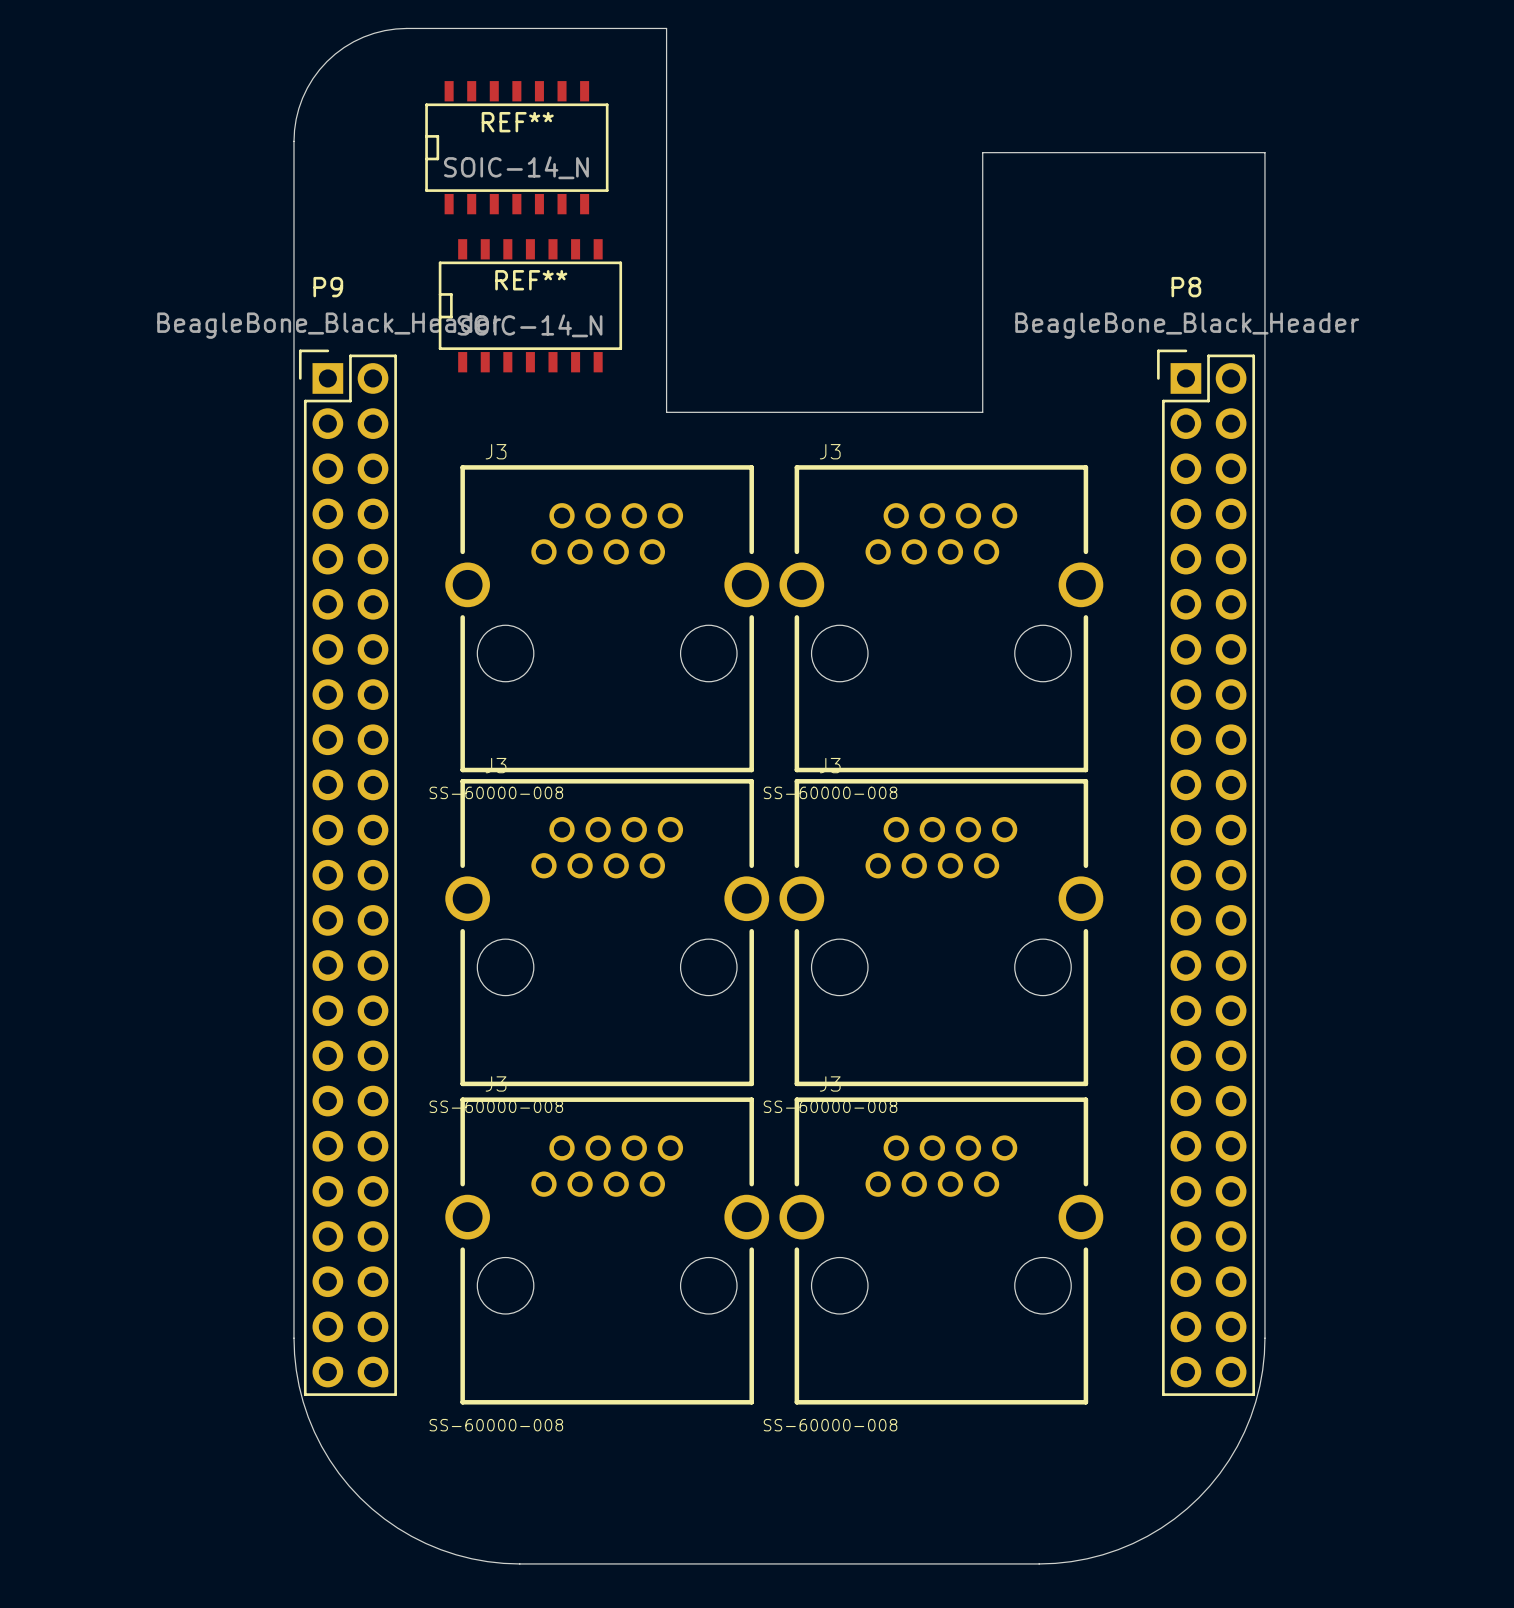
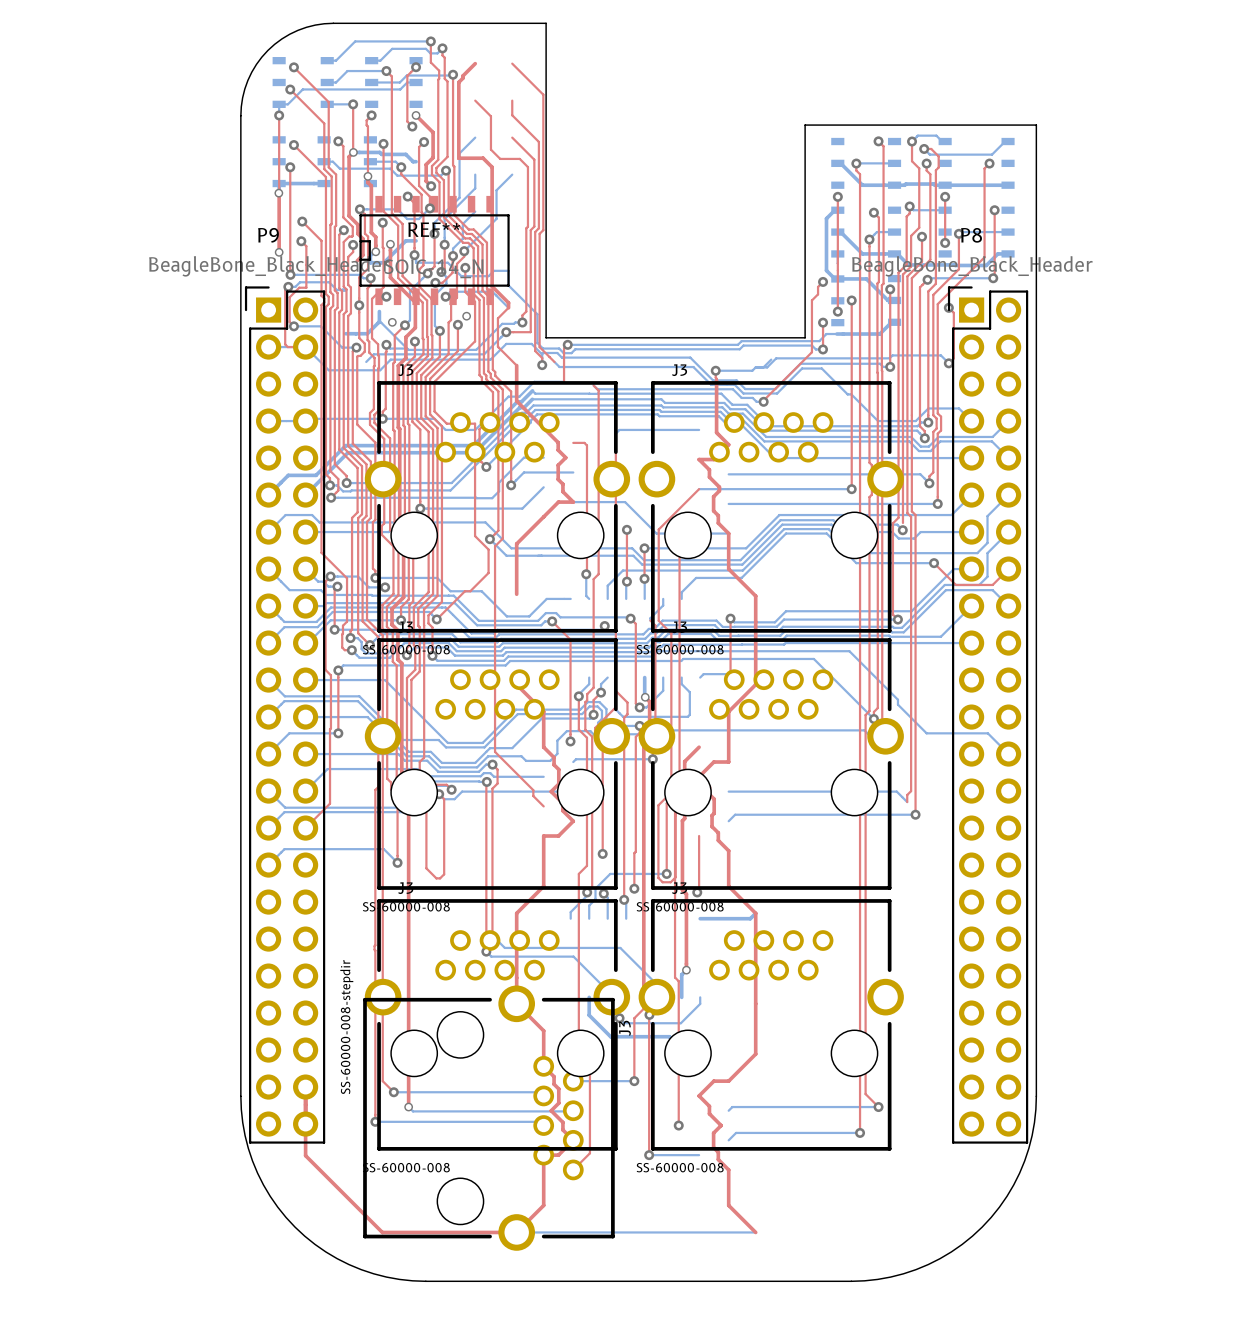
bottom track: none -> (430, 41) (355, 41) (336, 60) (327, 60)
top track: none -> (430, 41) (430, 62) (439, 70) (438, 159) (431, 166) (431, 174) (439, 182) (439, 219) (463, 242) (468, 242) (473, 248) (473, 294) (479, 299) (479, 375) (481, 381) (493, 392) (493, 415) (479, 429) (479, 460) (486, 466)
via: none -> (430, 41)
bottom track: none -> (442, 48) (437, 53) (430, 53) (425, 48) (392, 48) (380, 60) (371, 60)
top track: none -> (442, 48) (442, 55) (444, 57) (444, 78) (447, 81) (447, 156) (436, 168) (436, 172) (443, 180) (443, 217) (465, 238) (470, 238) (478, 246) (478, 292) (483, 298) (483, 373) (486, 379) (498, 391) (498, 530) (489, 539)
via: none -> (442, 48)
top track: none -> (475, 63) (458, 82) (458, 158)
top track: none -> (512, 63) (543, 94) (543, 230) (539, 233) (539, 347) (554, 362)
top track: none -> (293, 67) (328, 102) (328, 167) (336, 174) (334, 290) (337, 293) (337, 307) (334, 310) (334, 464) (346, 475) (346, 483)
via: none -> (293, 67)
top track: none -> (416, 67) (407, 75) (407, 121) (412, 126)
via: none -> (416, 67)
bottom track: none -> (386, 71) (347, 71) (336, 82) (327, 82)
top track: none -> (386, 71) (391, 76) (391, 213) (402, 223) (402, 276) (427, 300) (427, 355) (412, 371) (412, 421) (420, 429) (420, 508)
via: none -> (386, 71)
bottom track: none -> (453, 74) (406, 75) (399, 82) (371, 82)
top track: none -> (453, 74) (454, 215) (468, 229) (473, 229) (486, 242) (486, 288) (492, 294) (492, 369) (495, 375) (511, 391) (511, 485)
via: none -> (453, 74)
part: none -> (279, 82)
part: none -> (327, 82)
part: none -> (371, 82)
bottom track: none -> (416, 82) (407, 82) (400, 89) (302, 89) (287, 104) (279, 104) (279, 115)
part: none -> (416, 82)
top track: none -> (290, 89) (324, 123) (324, 169) (331, 176) (330, 292) (333, 294) (333, 305) (330, 308) (330, 471) (338, 479) (338, 490) (331, 497)
via: none -> (290, 89)
top track: none -> (475, 100) (490, 116) (490, 149) (500, 158) (519, 158) (527, 167) (526, 311) (522, 315) (522, 322)
top track: none -> (512, 100) (512, 115) (538, 141) (538, 228) (535, 232) (535, 351) (542, 358) (542, 365)
bottom track: none -> (327, 104) (353, 104)
top track: none -> (353, 104) (353, 152) (349, 156) (349, 215) (357, 224) (357, 233) (362, 238) (362, 255) (357, 260)
via: none -> (353, 104)
top track: none -> (279, 115) (279, 252)
via: none -> (279, 115)
top track: none -> (371, 115) (366, 120) (367, 182) (371, 185) (371, 232) (375, 237) (375, 251)
via: none -> (371, 115)
top track: none -> (416, 115) (433, 132) (433, 157) (426, 164) (426, 181) (431, 186)
via: none -> (416, 115)
REF**: SOIC-14_N (516, 147) -> none
via: none -> (412, 126)
bottom track: none -> (475, 137) (459, 153) (459, 197) (434, 222) (434, 233)
top track: none -> (512, 137) (534, 159) (534, 226) (530, 230) (530, 331) (506, 332)
top track: none -> (338, 141) (343, 146) (343, 217) (352, 226) (352, 235) (343, 242) (343, 286) (346, 289) (346, 311) (343, 314) (343, 447) (362, 466) (362, 514) (358, 518) (358, 633) (369, 645)
via: none -> (338, 141)
top track: none -> (878, 141) (883, 146) (882, 748)
via: none -> (878, 141)
bottom track: none -> (912, 141) (917, 135) (936, 135) (942, 141) (945, 141)
top track: none -> (912, 141) (912, 161) (919, 168) (919, 227) (911, 235) (911, 266) (902, 274) (902, 522)
via: none -> (912, 141)
bottom track: none -> (1008, 141) (1005, 141) (992, 154) (929, 154) (924, 148)
top track: none -> (424, 142) (419, 147) (419, 185) (429, 196) (429, 208)
via: none -> (424, 142)
top track: none -> (383, 143) (383, 211) (398, 225) (398, 277) (422, 302) (423, 354) (407, 369) (409, 515) (413, 519) (413, 601) (409, 605) (409, 645) (406, 648) (406, 655)
via: none -> (383, 143)
top track: none -> (293, 145) (325, 177) (325, 293) (328, 296) (328, 304) (325, 306) (325, 474) (330, 478) (330, 485)
via: none -> (293, 145)
top track: none -> (924, 148) (931, 148) (938, 156) (938, 167) (935, 170) (935, 283) (928, 291) (928, 422)
via: none -> (924, 148)
bottom track: none -> (353, 152) (405, 154) (413, 161) (416, 161)
via: none -> (353, 152)
top track: none -> (458, 158) (483, 158) (492, 167) (492, 286) (508, 302) (508, 307) (497, 318) (497, 346) (516, 365) (516, 401) (558, 442) (558, 450) (565, 457) (558, 465) (558, 479) (562, 484) (562, 491) (573, 502) (558, 502) (516, 543) (516, 594)
part: none -> (279, 161)
bottom track: none -> (324, 161) (332, 161) (339, 168) (390, 168) (397, 175) (441, 175) (446, 170)
part: none -> (324, 161)
bottom track: none -> (370, 161) (395, 161) (401, 167)
part: none -> (370, 161)
bottom track: none -> (837, 163) (840, 163) (862, 185) (1008, 185)
part: none -> (837, 163)
bottom track: none -> (856, 163) (894, 163)
top track: none -> (856, 163) (856, 170) (860, 174) (860, 1132)
via: none -> (856, 163)
part: none -> (894, 163)
top track: none -> (926, 163) (926, 170) (930, 174) (930, 259) (911, 278) (911, 511) (915, 515) (915, 814)
via: none -> (926, 163)
part: none -> (945, 163)
top track: none -> (989, 163) (984, 168) (984, 257) (937, 304) (937, 413) (941, 416) (941, 430) (937, 433) (937, 503)
via: none -> (989, 163)
part: none -> (1008, 163)
top track: none -> (290, 167) (290, 274)
via: none -> (290, 167)
top track: none -> (401, 167) (401, 174) (421, 194) (423, 265) (419, 269) (419, 286) (431, 298) (432, 335) (432, 357) (416, 373) (416, 419) (428, 431) (428, 592) (413, 607) (415, 669) (406, 678) (406, 774) (426, 794) (426, 868) (436, 878) (440, 878) (444, 874) (444, 799) (439, 794)
via: none -> (401, 167)
top track: none -> (446, 170) (448, 173) (448, 215) (466, 233) (471, 233) (482, 244) (482, 290) (488, 296) (488, 371) (490, 377) (502, 389) (502, 538) (495, 546) (495, 751) (533, 790) (533, 796) (543, 806)
via: none -> (446, 170)
bottom track: none -> (475, 174) (475, 188) (444, 218) (444, 244)
bottom track: none -> (512, 174) (496, 190) (496, 218) (464, 251)
via: none -> (367, 176)
bottom track: none -> (324, 183) (279, 183) (278, 193)
via: none -> (431, 186)
via: none -> (278, 193)
top track: none -> (407, 196) (414, 203) (414, 255)
via: none -> (407, 196)
top track: none -> (837, 196) (837, 311)
via: none -> (837, 196)
top track: none -> (945, 196) (945, 242)
via: none -> (945, 196)
bottom track: none -> (909, 206) (913, 210) (945, 210)
top track: none -> (909, 206) (909, 213) (906, 216) (906, 264) (898, 272) (898, 517) (892, 523) (892, 614) (897, 619)
via: none -> (909, 206)
bottom track: none -> (429, 208) (418, 219) (407, 219) (397, 209) (359, 209)
via: none -> (429, 208)
top track: none -> (359, 209) (364, 214) (364, 233) (368, 236) (368, 268) (359, 277) (359, 338) (364, 343) (364, 351) (357, 356) (357, 424) (375, 442) (375, 519) (372, 522) (372, 568) (375, 570) (375, 577)
via: none -> (359, 209)
bottom track: none -> (837, 210) (834, 210) (826, 218) (826, 270) (834, 278) (866, 278) (887, 300) (894, 300)
top track: none -> (994, 210) (993, 278)
via: none -> (994, 210)
bottom track: none -> (475, 211) (462, 224) (462, 238) (453, 248) (453, 256)
top track: none -> (873, 212) (878, 217) (877, 708) (873, 711) (873, 719)
via: none -> (873, 212)
top track: none -> (302, 221) (321, 240) (321, 295) (324, 298) (321, 305) (321, 552) (347, 578) (347, 621) (342, 625) (342, 647) (344, 650) (351, 650)
via: none -> (302, 221)
top track: none -> (382, 222) (383, 287) (372, 298) (372, 338) (378, 344) (379, 356) (378, 410) (374, 414) (374, 422) (390, 438) (390, 530)
via: none -> (382, 222)
top track: none -> (343, 230) (339, 234) (339, 288) (342, 291) (342, 309) (339, 312) (339, 449) (357, 468) (357, 512) (352, 517) (350, 638)
via: none -> (343, 230)
bottom track: none -> (837, 232) (840, 232) (862, 253) (897, 253) (908, 264) (986, 265) (997, 253) (1008, 253)
part: none -> (837, 232)
bottom track: none -> (894, 232) (876, 232) (869, 239)
part: none -> (894, 232)
part: none -> (945, 232)
bottom track: none -> (1008, 232) (960, 232) (958, 233)
part: none -> (1008, 232)
top track: none -> (434, 233) (434, 266) (427, 273)
via: none -> (434, 233)
top track: none -> (958, 233) (958, 269) (933, 294) (933, 415) (936, 418) (936, 428) (933, 431) (933, 472) (929, 476) (929, 483)
via: none -> (958, 233)
top track: none -> (922, 236) (922, 261) (907, 276) (907, 513) (911, 516) (911, 791) (907, 795) (907, 802)
via: none -> (922, 236)
top track: none -> (869, 239) (869, 462) (871, 465) (871, 494) (869, 497) (869, 711) (865, 715) (865, 1094) (878, 1107)
via: none -> (869, 239)
top track: none -> (301, 241) (306, 246) (306, 287) (299, 287) (289, 297) (289, 322) (293, 326)
via: none -> (301, 241)
bottom track: none -> (416, 240) (405, 240) (384, 262) (370, 262) (370, 255) (375, 251)
via: none -> (945, 242)
top track: none -> (353, 244) (353, 252) (348, 257) (348, 284) (350, 287) (350, 313) (348, 316) (348, 446) (366, 464) (366, 516) (362, 519) (362, 621) (378, 637) (378, 786) (375, 789) (375, 1121)
via: none -> (353, 244)
top track: none -> (390, 244) (390, 277) (415, 302) (415, 327) (405, 337) (405, 358) (398, 365) (399, 519) (403, 523) (403, 597) (392, 608) (392, 624) (397, 630) (397, 659) (401, 663) (401, 777) (408, 783) (408, 1107)
via: none -> (390, 244)
top track: none -> (444, 244) (444, 268) (441, 271)
via: none -> (444, 244)
top track: none -> (464, 251) (464, 256) (457, 263) (457, 297) (451, 303) (451, 320) (448, 322) (448, 354) (425, 377) (425, 416) (437, 428) (437, 595) (424, 609) (424, 625)
via: none -> (464, 251)
via: none -> (375, 251)
via: none -> (279, 252)
bottom track: none -> (414, 255) (416, 262) (447, 262) (461, 276) (488, 276) (493, 270) (508, 270) (508, 285) (537, 314) (537, 342) (542, 348) (559, 348) (563, 353) (571, 353) (575, 349) (739, 349) (743, 345) (812, 345) (815, 349) (823, 349)
via: none -> (414, 255)
top track: none -> (453, 256) (452, 272) (442, 282) (435, 282)
via: none -> (453, 256)
top track: none -> (465, 267) (465, 292) (475, 301) (475, 341) (434, 381) (434, 411) (446, 423) (475, 423) (475, 536) (488, 549) (488, 572) (470, 591) (464, 591) (436, 619)
via: none -> (465, 267)
bottom track: none -> (441, 271) (446, 276) (446, 283) (434, 295) (434, 325) (439, 330)
via: none -> (441, 271)
bottom track: none -> (427, 273) (409, 291) (409, 320) (404, 325)
via: none -> (427, 273)
bottom track: none -> (290, 274) (360, 274) (363, 278) (370, 278)
via: none -> (290, 274)
top track: none -> (370, 278) (370, 285) (367, 288) (367, 340) (369, 352) (374, 357) (374, 365) (373, 409) (369, 413) (369, 424) (384, 438) (384, 523) (381, 525) (381, 534) (393, 546) (393, 593) (382, 605) (382, 628) (387, 633) (387, 778) (391, 782) (391, 789)
via: none -> (370, 278)
bottom track: none -> (993, 278) (929, 278) (927, 279)
via: none -> (993, 278)
top track: none -> (927, 279) (919, 287) (919, 426) (924, 431) (924, 438)
via: none -> (927, 279)
top track: none -> (823, 281) (818, 286) (818, 294) (811, 300) (811, 352) (763, 401)
via: none -> (823, 281)
via: none -> (435, 282)
bottom track: none -> (288, 286) (295, 286) (300, 282) (329, 282) (336, 290) (345, 290) (342, 290)
top track: none -> (288, 286) (285, 290) (285, 344) (287, 347) (305, 347)
via: none -> (288, 286)
top track: none -> (890, 289) (890, 366)
via: none -> (890, 289)
via: none -> (386, 296)
bottom track: none -> (445, 296) (450, 291) (492, 291) (508, 307)
via: none -> (445, 296)
top track: none -> (851, 300) (851, 489)
via: none -> (851, 300)
part: none -> (894, 300)
part: none -> (837, 300)
via: none -> (359, 305)
top track: none -> (948, 307) (953, 312) (953, 358) (948, 363)
via: none -> (948, 307)
bottom track: none -> (379, 311) (379, 321) (367, 333) (345, 333)
via: none -> (837, 311)
via: none -> (466, 316)
via: none -> (392, 322)
bottom track: none -> (522, 322) (502, 323) (476, 349) (408, 349) (381, 322) (378, 322)
via: none -> (522, 322)
top track: none -> (823, 322) (823, 349)
via: none -> (823, 322)
bottom track: none -> (894, 322) (891, 322) (879, 334) (826, 334) (819, 341) (741, 341) (737, 344) (567, 344) (567, 341)
top track: none -> (457, 324) (457, 351) (430, 378) (430, 414) (441, 426) (441, 601) (428, 615) (428, 623) (432, 627) (432, 655)
via: none -> (457, 324)
top track: none -> (404, 325) (394, 335) (394, 361) (393, 363) (394, 521) (398, 525) (398, 595) (386, 606) (386, 626) (392, 632) (392, 661) (396, 665) (396, 782) (399, 785) (397, 795) (397, 862)
via: none -> (404, 325)
bottom track: none -> (293, 326) (320, 326) (342, 347) (356, 347)
via: none -> (293, 326)
top track: none -> (439, 330) (439, 356) (421, 375) (421, 418) (433, 429) (433, 594) (418, 608) (419, 671) (411, 679) (411, 773) (423, 784) (446, 784) (451, 789)
via: none -> (439, 330)
bottom track: none -> (506, 332) (484, 354) (373, 354) (366, 361)
via: none -> (506, 332)
top track: none -> (414, 341) (414, 356) (403, 367) (404, 517) (408, 521) (408, 599) (401, 607) (401, 620)
via: none -> (414, 341)
bottom track: none -> (386, 344) (390, 348) (407, 348)
top track: none -> (386, 344) (385, 408) (382, 411) (382, 418)
via: none -> (386, 344)
top track: none -> (567, 344) (564, 348) (564, 381)
via: none -> (567, 344)
bottom track: none -> (268, 347) (305, 347) (328, 370) (380, 370) (390, 359) (490, 359) (506, 343) (531, 343) (542, 354) (542, 365)
top track: none -> (356, 347) (352, 351) (352, 443) (370, 461) (370, 517) (367, 521) (367, 619) (382, 635) (382, 1081) (393, 1092)
via: none -> (356, 347)
via: none -> (823, 349)
bottom track: none -> (541, 354) (557, 352) (561, 357) (690, 357) (713, 380) (736, 380) (745, 389) (775, 389) (800, 363) (879, 363) (883, 366) (890, 366)
bottom track: none -> (771, 359) (763, 367)
bottom track: none -> (554, 362) (559, 367) (693, 367) (711, 384) (734, 384) (743, 393) (777, 393) (802, 368) (821, 368) (878, 421) (915, 421) (928, 408) (959, 408) (971, 421)
bottom track: none -> (948, 363) (940, 355) (892, 355) (889, 358) (776, 358) (767, 367) (755, 367) (752, 370) (715, 370)
via: none -> (948, 363)
via: none -> (542, 365)
via: none -> (890, 366)
top track: none -> (715, 370) (716, 432) (728, 444) (713, 459) (699, 459) (709, 469) (709, 477) (719, 487) (719, 490) (713, 496) (713, 510) (718, 515) (718, 523) (728, 533) (728, 569) (755, 596) (755, 684) (728, 711) (728, 762) (713, 762) (699, 776) (709, 787) (709, 794) (714, 799) (712, 826) (718, 832) (718, 840) (728, 850) (728, 886)
via: none -> (715, 370)
bottom track: none -> (564, 381) (534, 381) (519, 396) (508, 396) (475, 429) (445, 429) (434, 418) (307, 418) (305, 421) (268, 421)
bottom track: none -> (593, 385) (597, 389) (732, 389) (741, 397) (752, 397) (756, 401) (763, 401)
top track: none -> (593, 385) (598, 390) (598, 574) (593, 579) (593, 687) (587, 694) (585, 702) (585, 729) (592, 736) (592, 887) (587, 892)
bottom track: none -> (589, 393) (535, 393) (532, 390) (521, 401) (517, 401) (473, 445) (345, 445) (316, 475) (288, 475) (268, 495)
bottom track: none -> (589, 393) (597, 393)
bottom track: none -> (597, 393) (721, 393) (732, 404) (747, 404) (768, 426) (917, 426) (921, 422) (928, 422)
via: none -> (763, 401)
via: none -> (382, 418)
bottom track: none -> (1008, 421) (992, 436) (938, 436) (928, 446) (920, 446) (911, 436) (766, 436) (742, 413) (728, 413) (722, 407) (533, 405) (526, 412) (521, 412) (451, 483) (346, 483)
via: none -> (928, 422)
bottom track: none -> (699, 429) (619, 429) (615, 433)
top track: none -> (615, 433) (615, 690) (627, 702) (627, 714) (624, 717) (624, 899)
bottom track: none -> (924, 438) (917, 430) (766, 430) (745, 409) (730, 409) (724, 402) (665, 402) (661, 399) (532, 399) (524, 407) (519, 407) (474, 452) (347, 452) (305, 495)
via: none -> (924, 438)
top track: none -> (573, 442) (584, 442) (586, 445) (586, 574)
bottom track: none -> (543, 457) (523, 457) (499, 482) (499, 491) (492, 498) (331, 497)
bottom track: none -> (971, 458) (774, 458) (739, 422) (725, 422) (718, 416) (537, 414) (486, 466)
bottom track: none -> (1008, 458) (991, 441) (940, 441) (930, 451) (919, 451) (909, 441) (764, 441) (741, 418) (726, 418) (720, 411) (535, 409) (528, 417) (523, 417) (450, 490) (343, 491) (337, 485) (330, 485)
via: none -> (486, 466)
bottom track: none -> (573, 472) (523, 472) (511, 485)
bottom track: none -> (728, 474) (920, 474) (929, 483)
via: none -> (346, 483)
via: none -> (929, 483)
via: none -> (330, 485)
via: none -> (511, 485)
bottom track: none -> (543, 487) (522, 508) (420, 508)
bottom track: none -> (699, 489) (851, 489)
top track: none -> (699, 489) (658, 529) (658, 620) (671, 633) (671, 792) (658, 805) (658, 877) (662, 882) (670, 882) (675, 877) (675, 808)
via: none -> (851, 489)
bottom track: none -> (971, 495) (951, 515) (779, 515) (746, 548) (644, 548)
bottom track: none -> (1008, 495) (987, 516) (987, 542) (977, 553) (852, 553) (828, 529) (784, 529) (742, 570) (622, 570) (607, 585) (607, 598)
via: none -> (331, 497)
bottom track: none -> (573, 502) (625, 502) (656, 533) (728, 533)
bottom track: none -> (728, 503) (937, 503)
via: none -> (937, 503)
via: none -> (420, 508)
top track: none -> (682, 518) (682, 525) (679, 528) (679, 790) (666, 803) (666, 873)
top track: none -> (626, 529) (626, 581)
via: none -> (626, 529)
bottom track: none -> (390, 530) (305, 532)
bottom track: none -> (902, 530) (897, 524) (837, 524) (833, 520) (780, 520) (740, 560) (644, 560) (632, 548) (511, 548) (485, 522) (319, 522) (312, 515) (285, 515) (268, 532)
via: none -> (902, 530)
bottom track: none -> (971, 532) (920, 532) (914, 538) (898, 538) (892, 532) (838, 532) (831, 524) (782, 524) (742, 564) (642, 564) (633, 555) (506, 555) (489, 539)
bottom track: none -> (1008, 532) (987, 553) (987, 576) (979, 584) (944, 584) (901, 627) (783, 626) (778, 631) (736, 631)
via: none -> (489, 539)
top track: none -> (644, 548) (644, 578)
via: none -> (644, 548)
bottom track: none -> (934, 563) (856, 563) (826, 533) (786, 533) (741, 577) (696, 577) (681, 592) (681, 598)
top track: none -> (934, 563) (955, 584) (992, 584) (1008, 569)
via: none -> (934, 563)
bottom track: none -> (268, 569) (289, 590) (320, 590) (325, 594) (453, 595) (478, 620) (538, 620) (545, 613) (556, 613) (560, 617) (629, 617)
bottom track: none -> (305, 569) (318, 581) (323, 581) (328, 586) (337, 586)
bottom track: none -> (971, 569) (953, 569) (911, 611) (786, 611) (774, 622) (734, 622) (730, 618)
bottom track: none -> (586, 574) (586, 595) (589, 598)
via: none -> (586, 574)
bottom track: none -> (330, 576) (358, 576) (368, 587) (385, 587)
top track: none -> (330, 576) (325, 581) (325, 670) (330, 675) (330, 803) (305, 828)
via: none -> (330, 576)
bottom track: none -> (375, 577) (437, 577) (450, 591) (481, 591) (506, 616) (529, 616) (546, 598) (570, 598)
via: none -> (375, 577)
bottom track: none -> (644, 579) (644, 598)
via: none -> (644, 578)
bottom track: none -> (626, 581) (626, 598)
via: none -> (626, 581)
top track: none -> (337, 586) (334, 589) (334, 629)
via: none -> (337, 586)
via: none -> (385, 587)
bottom track: none -> (663, 598) (663, 605) (650, 620)
bottom track: none -> (268, 606) (284, 621) (316, 621) (330, 607) (445, 607) (471, 633) (493, 633) (497, 629) (604, 629) (604, 626)
bottom track: none -> (305, 606) (323, 606) (326, 603) (454, 603) (477, 625) (541, 625) (545, 621) (552, 621)
bottom track: none -> (971, 606) (940, 636) (786, 635) (782, 640) (740, 640)
bottom track: none -> (1008, 606) (992, 590) (945, 590) (903, 632) (784, 631) (780, 635) (738, 635)
top track: none -> (630, 618) (635, 623) (635, 703) (639, 707)
via: none -> (630, 618)
top track: none -> (730, 618) (730, 674)
via: none -> (730, 618)
bottom track: none -> (436, 619) (429, 611) (332, 611) (317, 627) (284, 627) (268, 643)
via: none -> (436, 619)
bottom track: none -> (897, 619) (784, 619) (776, 626) (734, 626)
via: none -> (897, 619)
bottom track: none -> (401, 620) (330, 620) (307, 643) (305, 643)
via: none -> (401, 620)
top track: none -> (650, 620) (655, 625) (655, 734) (651, 738) (652, 759)
top track: none -> (552, 621) (570, 639) (570, 741)
via: none -> (552, 621)
top track: none -> (424, 625) (424, 757) (419, 761) (419, 769)
via: none -> (604, 626)
bottom track: none -> (734, 626) (722, 626) (716, 620) (662, 620) (654, 628) (648, 628) (643, 634) (499, 634) (495, 637) (469, 637) (461, 629) (334, 629)
via: none -> (334, 629)
bottom track: none -> (736, 631) (721, 631) (714, 625) (664, 625) (656, 633) (650, 633) (645, 638) (500, 638) (497, 642) (460, 642) (452, 634) (380, 634) (369, 645)
bottom track: none -> (738, 635) (719, 635) (712, 629) (666, 629) (658, 637) (652, 637) (647, 643) (502, 643) (499, 646) (458, 646) (450, 638) (402, 638) (387, 653) (365, 653) (361, 649) (361, 642) (357, 638) (350, 638)
via: none -> (350, 638)
bottom track: none -> (740, 640) (717, 640) (711, 633) (668, 633) (659, 642) (654, 642) (648, 647) (504, 647) (501, 651) (456, 651) (448, 643) (404, 643) (389, 657) (359, 657) (351, 650)
bottom track: none -> (971, 643) (742, 644)
bottom track: none -> (741, 644) (663, 644) (656, 646) (650, 652) (506, 652) (502, 655) (454, 655) (446, 647) (414, 647) (406, 655)
via: none -> (369, 645)
via: none -> (351, 650)
via: none -> (406, 655)
bottom track: none -> (432, 655) (437, 660) (504, 660) (508, 656) (652, 656) (657, 651) (849, 651) (897, 699) (897, 704) (926, 733) (987, 733) (1008, 754)
via: none -> (432, 655)
bottom track: none -> (338, 670) (343, 665) (505, 665) (510, 661) (813, 658) (873, 719)
top track: none -> (338, 670) (338, 733)
via: none -> (338, 670)
bottom track: none -> (730, 674) (703, 674) (700, 677)
bottom track: none -> (589, 677) (589, 684) (578, 696)
bottom track: none -> (607, 677) (601, 684) (601, 692)
bottom track: none -> (644, 677) (645, 697)
bottom track: none -> (663, 677) (663, 690) (646, 707) (639, 707)
bottom track: none -> (681, 677) (681, 684) (689, 692) (689, 714) (687, 716) (623, 716) (614, 708)
bottom track: none -> (268, 680) (284, 696) (359, 696) (403, 740) (438, 740) (446, 747) (484, 747) (517, 714) (582, 714) (589, 706) (597, 706) (601, 710) (601, 718) (598, 722) (598, 732) (603, 737) (612, 737) (624, 725) (639, 725)
bottom track: none -> (305, 680) (384, 680) (447, 742) (482, 742) (515, 709) (580, 709) (587, 702) (599, 702) (606, 709) (607, 729)
top track: none -> (516, 684) (543, 711) (543, 747) (554, 757) (554, 764) (558, 769) (558, 784) (551, 791) (562, 803) (562, 810) (573, 821) (558, 836) (543, 836) (543, 886) (516, 913) (516, 1003) (543, 1030) (543, 1066) (554, 1076) (554, 1084) (558, 1088) (558, 1103) (551, 1110) (562, 1122) (562, 1129) (573, 1140) (558, 1155) (543, 1155) (543, 1205) (516, 1232) (382, 1232) (305, 1155) (305, 1087)
top track: none -> (601, 692) (593, 700) (593, 714)
via: none -> (601, 692)
top track: none -> (578, 696) (578, 729) (586, 737) (586, 865) (578, 873) (578, 1040) (589, 1051) (589, 1153) (573, 1169)
via: none -> (578, 696)
top track: none -> (645, 697) (649, 701) (649, 732) (643, 738) (643, 1008) (634, 1018) (634, 1081)
via: none -> (645, 697)
via: none -> (639, 707)
top track: none -> (614, 708) (595, 728) (595, 733) (602, 740) (602, 853)
bottom track: none -> (593, 714) (593, 718) (541, 718) (512, 748) (490, 748) (475, 762) (441, 762) (430, 751) (408, 751) (357, 701) (284, 701) (268, 717)
via: none -> (593, 714)
bottom track: none -> (305, 717) (367, 717) (406, 756) (429, 756) (440, 767) (477, 767) (488, 756) (521, 756) (526, 760) (550, 760) (557, 753) (557, 740) (566, 731) (590, 731) (601, 742) (614, 742) (622, 734) (643, 734) (647, 730) (864, 730) (882, 748)
via: none -> (873, 719)
top track: none -> (639, 725) (639, 733) (635, 736) (634, 888)
via: none -> (639, 725)
bottom track: none -> (338, 733) (289, 733) (268, 754)
via: none -> (338, 733)
via: none -> (570, 741)
top track: none -> (699, 747) (684, 761) (682, 890) (686, 894) (686, 970)
bottom track: none -> (305, 754) (398, 754) (404, 760) (427, 760) (438, 771) (478, 771) (486, 764) (492, 764)
bottom track: none -> (652, 759) (576, 759) (573, 762)
via: none -> (652, 759)
top track: none -> (492, 764) (497, 769) (497, 783) (492, 788) (492, 935) (497, 940)
via: none -> (492, 764)
bottom track: none -> (419, 769) (327, 769) (305, 791)
bottom track: none -> (543, 776) (494, 776) (490, 773) (483, 773) (480, 776) (424, 776) (411, 789) (391, 789)
bottom track: none -> (486, 781) (425, 781) (399, 807) (285, 807) (268, 791)
top track: none -> (486, 781) (486, 951)
via: none -> (486, 781)
bottom track: none -> (451, 789) (447, 785) (430, 785) (404, 812) (284, 812) (268, 828)
via: none -> (451, 789)
bottom track: none -> (573, 791) (462, 791) (454, 799) (444, 799) (439, 794)
bottom track: none -> (728, 791) (896, 791) (907, 802)
via: none -> (439, 794)
top track: none -> (675, 807) (675, 977) (678, 981) (678, 1125)
bottom track: none -> (915, 814) (735, 814) (728, 821)
via: none -> (915, 814)
top track: none -> (699, 836) (699, 890) (697, 892)
via: none -> (602, 853)
bottom track: none -> (397, 862) (383, 849) (284, 849) (268, 865)
via: none -> (397, 862)
bottom track: none -> (666, 873) (610, 873) (595, 888) (595, 899) (589, 905) (589, 918)
via: none -> (666, 873)
top track: none -> (728, 886) (755, 913) (755, 1054) (728, 1081) (713, 1081) (699, 1095) (709, 1106) (709, 1113) (721, 1125) (713, 1133) (713, 1147) (718, 1152) (718, 1159) (728, 1169) (728, 1205) (755, 1232)
via: none -> (634, 888)
bottom track: none -> (587, 892) (587, 895) (570, 912) (570, 918)
via: none -> (587, 892)
via: none -> (697, 892)
bottom track: none -> (603, 893) (607, 897) (607, 918)
via: none -> (603, 893)
bottom track: none -> (624, 899) (626, 901) (626, 918)
via: none -> (624, 899)
bottom track: none -> (755, 913) (750, 918) (700, 918)
bottom track: none -> (497, 940) (504, 947) (620, 947) (663, 990) (663, 997)
bottom track: none -> (486, 951) (491, 956) (573, 956) (607, 990) (607, 997)
via: none -> (486, 951)
bottom track: none -> (686, 970) (681, 974) (681, 997)
via: none -> (686, 970)
bottom track: none -> (589, 997) (589, 1015) (610, 1036) (669, 1036) (699, 1066)
bottom track: none -> (700, 997) (700, 1003) (680, 1023) (624, 1023) (619, 1018)
top track: none -> (649, 1014) (649, 1155)
via: none -> (649, 1014)
via: none -> (619, 1018)
bottom track: none -> (573, 1081) (634, 1081)
via: none -> (634, 1081)
bottom track: none -> (393, 1092) (540, 1092) (543, 1095)
via: none -> (393, 1092)
bottom track: none -> (408, 1107) (413, 1111) (573, 1110)
via: none -> (408, 1107)
bottom track: none -> (878, 1107) (732, 1107) (728, 1110)
via: none -> (878, 1107)
J3: none -> SS-60000-008-stepdir (488, 1118)
bottom track: none -> (375, 1121) (540, 1121) (543, 1125)
via: none -> (375, 1121)
via: none -> (678, 1125)
bottom track: none -> (860, 1132) (736, 1132) (728, 1140)
via: none -> (860, 1132)
bottom track: none -> (649, 1155) (699, 1155)
via: none -> (649, 1155)
bottom track: none -> (516, 1232) (755, 1232)

